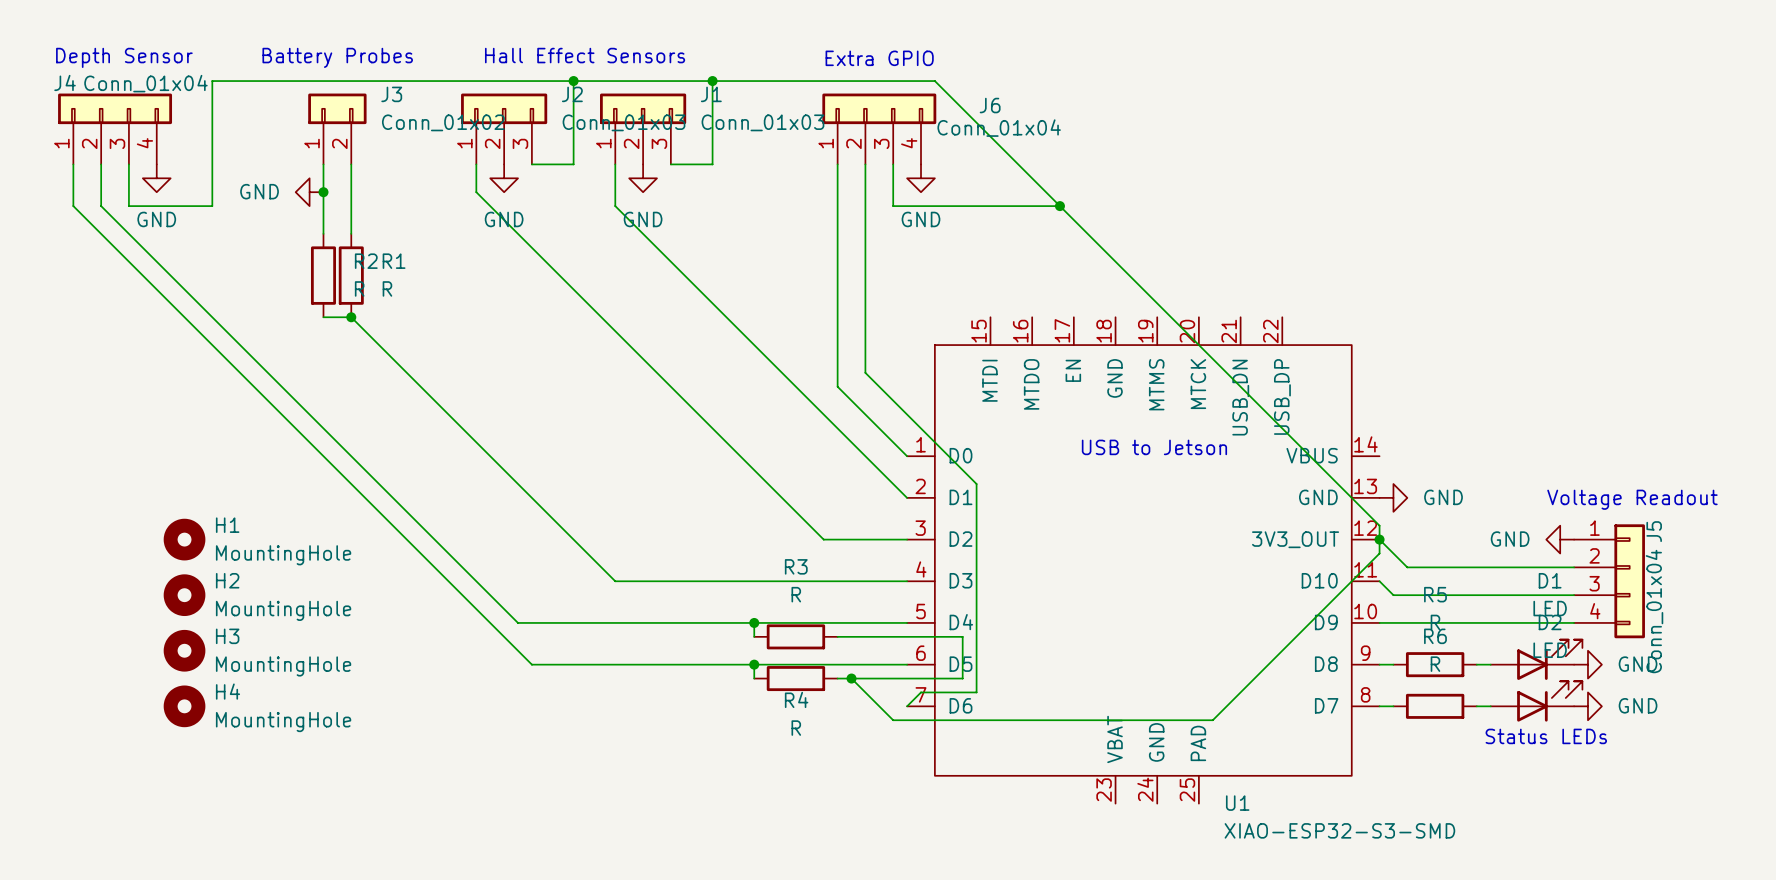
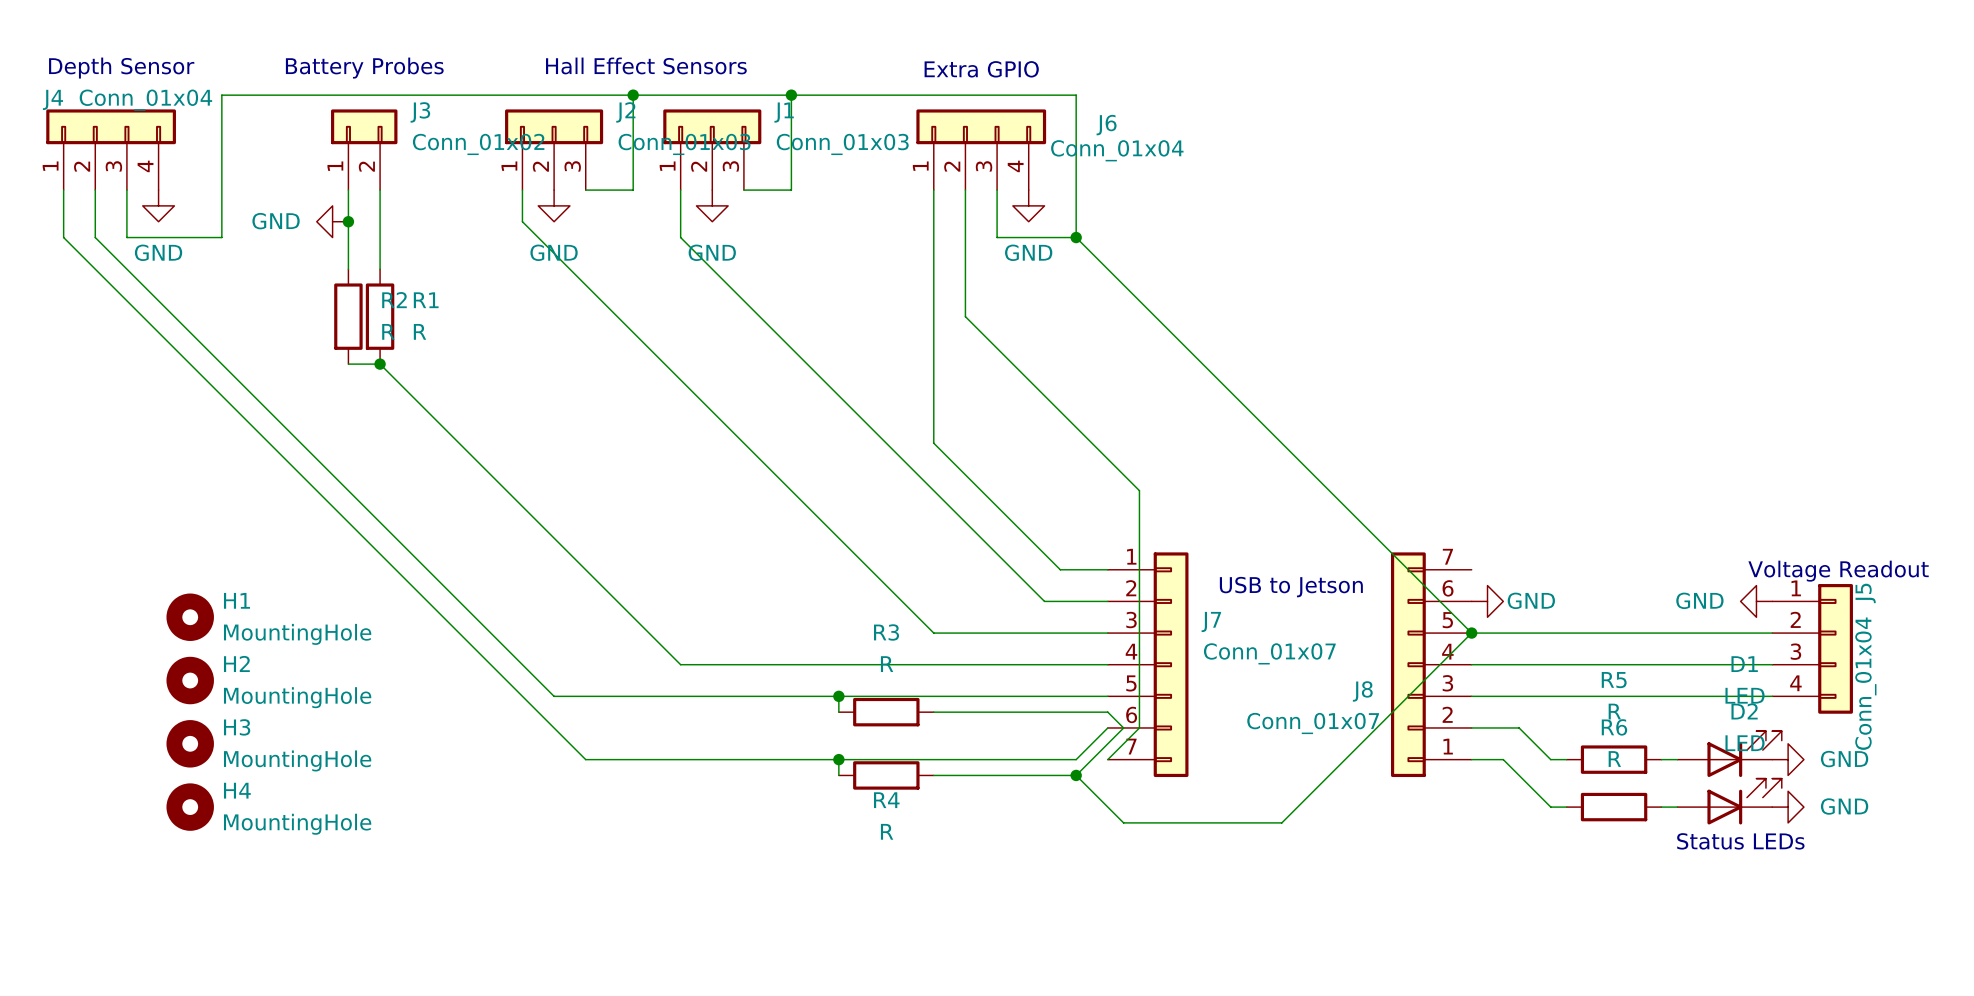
wire: (934, 81) (1379, 525) (1379, 553) (1212, 720) (1143, 720) -> (1044, 95) (1076, 95) (1076, 237) (1471, 633)
wire: (962, 206) (1059, 206) -> none
junction: none -> (1076, 237)
junction: (1059, 206) -> none
wire: (865, 275) (865, 372) (976, 484) (976, 692) (921, 692) (907, 706) -> (965, 316) (1139, 490) (1139, 727) (1107, 759)
text position: USB to Jetson (1154, 447) -> USB to Jetson (1291, 587)
wire: none -> (1012, 522) (1060, 569) (1107, 569)
wire: none -> (1012, 569) (1044, 601) (1107, 601)
power symbol position: GND (1393, 497) -> GND (1487, 601)
power symbol text position: GND (1443, 497) -> GND (1531, 600)
wire: (823, 539) (907, 539) -> (917, 617) (933, 633) (1107, 633)
wire: (1379, 539) (1407, 567) (1574, 567) -> none
junction: (1379, 539) -> none
power symbol position: GND (1560, 539) -> GND (1756, 601)
wire: none -> (1471, 633) (1772, 633)
wire: none -> (1471, 633) (1281, 822)
junction: none -> (1471, 633)
U1: XIAO-ESP32-S3-SMD (1143, 560) -> none
wire: none -> (1012, 664) (1107, 664)
J7: none -> Conn_01x07 (1148, 664)
J8: none -> Conn_01x07 (1431, 664)
wire: none -> (1471, 664) (1772, 664)
wire: (1379, 581) (1393, 595) (1574, 595) -> none
J5 position: (1609, 581) -> (1812, 648)
wire: (504, 609) (518, 622) (837, 622) -> (554, 696) (1107, 696)
wire: none -> (1471, 696) (1772, 696)
wire: (754, 622) (754, 636) -> (838, 712) (838, 696)
junction position: (754, 622) -> (838, 696)
wire: (1379, 622) (1574, 622) -> none
R3 position: (795, 636) -> (886, 712)
wire: (837, 636) (962, 636) (962, 678) -> none
wire: none -> (1107, 727) (1076, 759) (1012, 759)
wire: none -> (1471, 727) (1519, 727) (1550, 759)
wire: none -> (1471, 759) (1503, 759) (1550, 807)
wire: (851, 678) (893, 720) (1004, 720) -> (1012, 712) (1107, 712) (1123, 727) (1076, 775) (1123, 822)
junction: (851, 678) -> none
junction: none -> (1076, 775)

